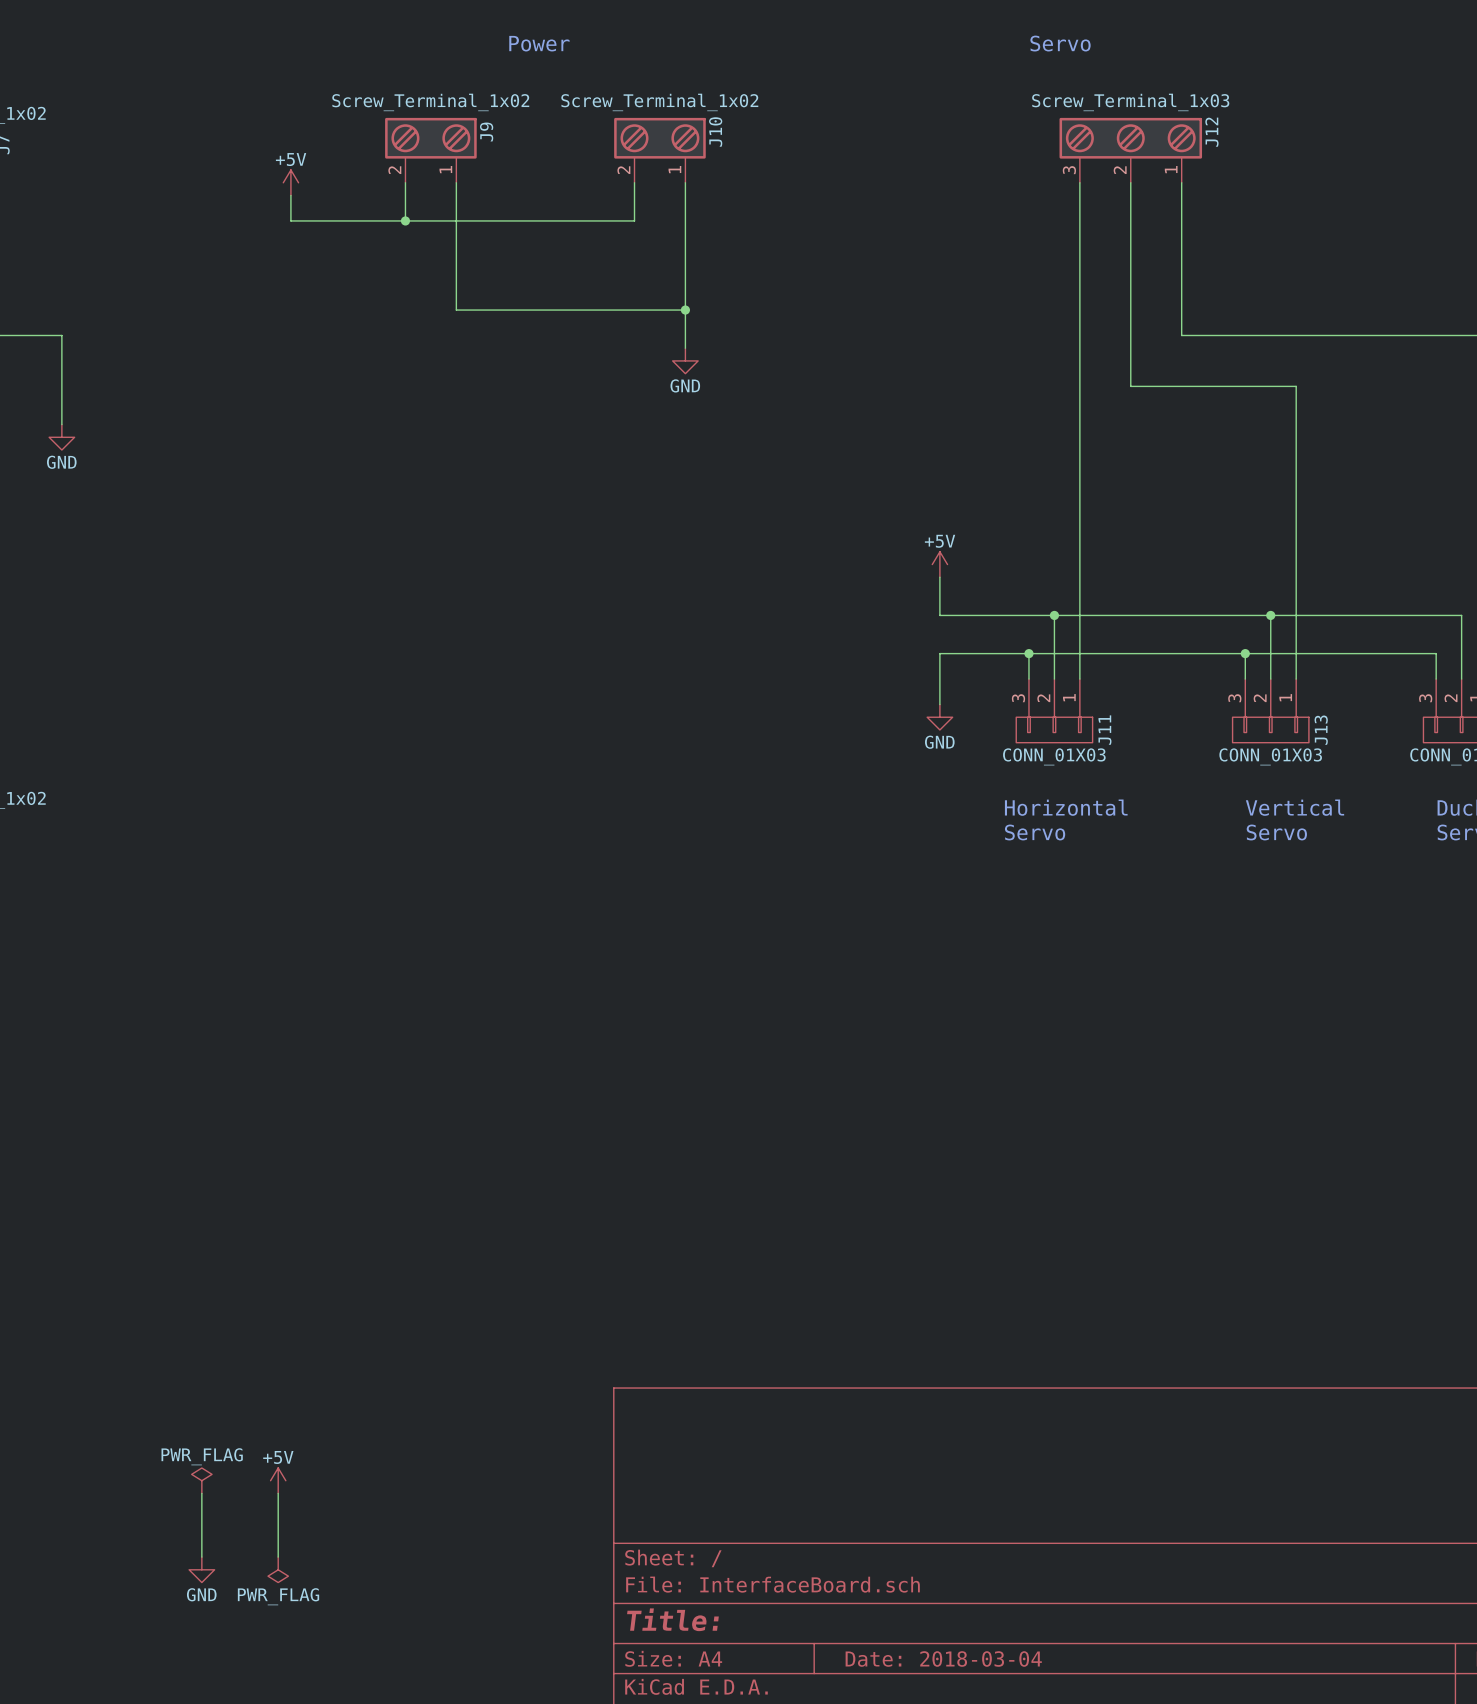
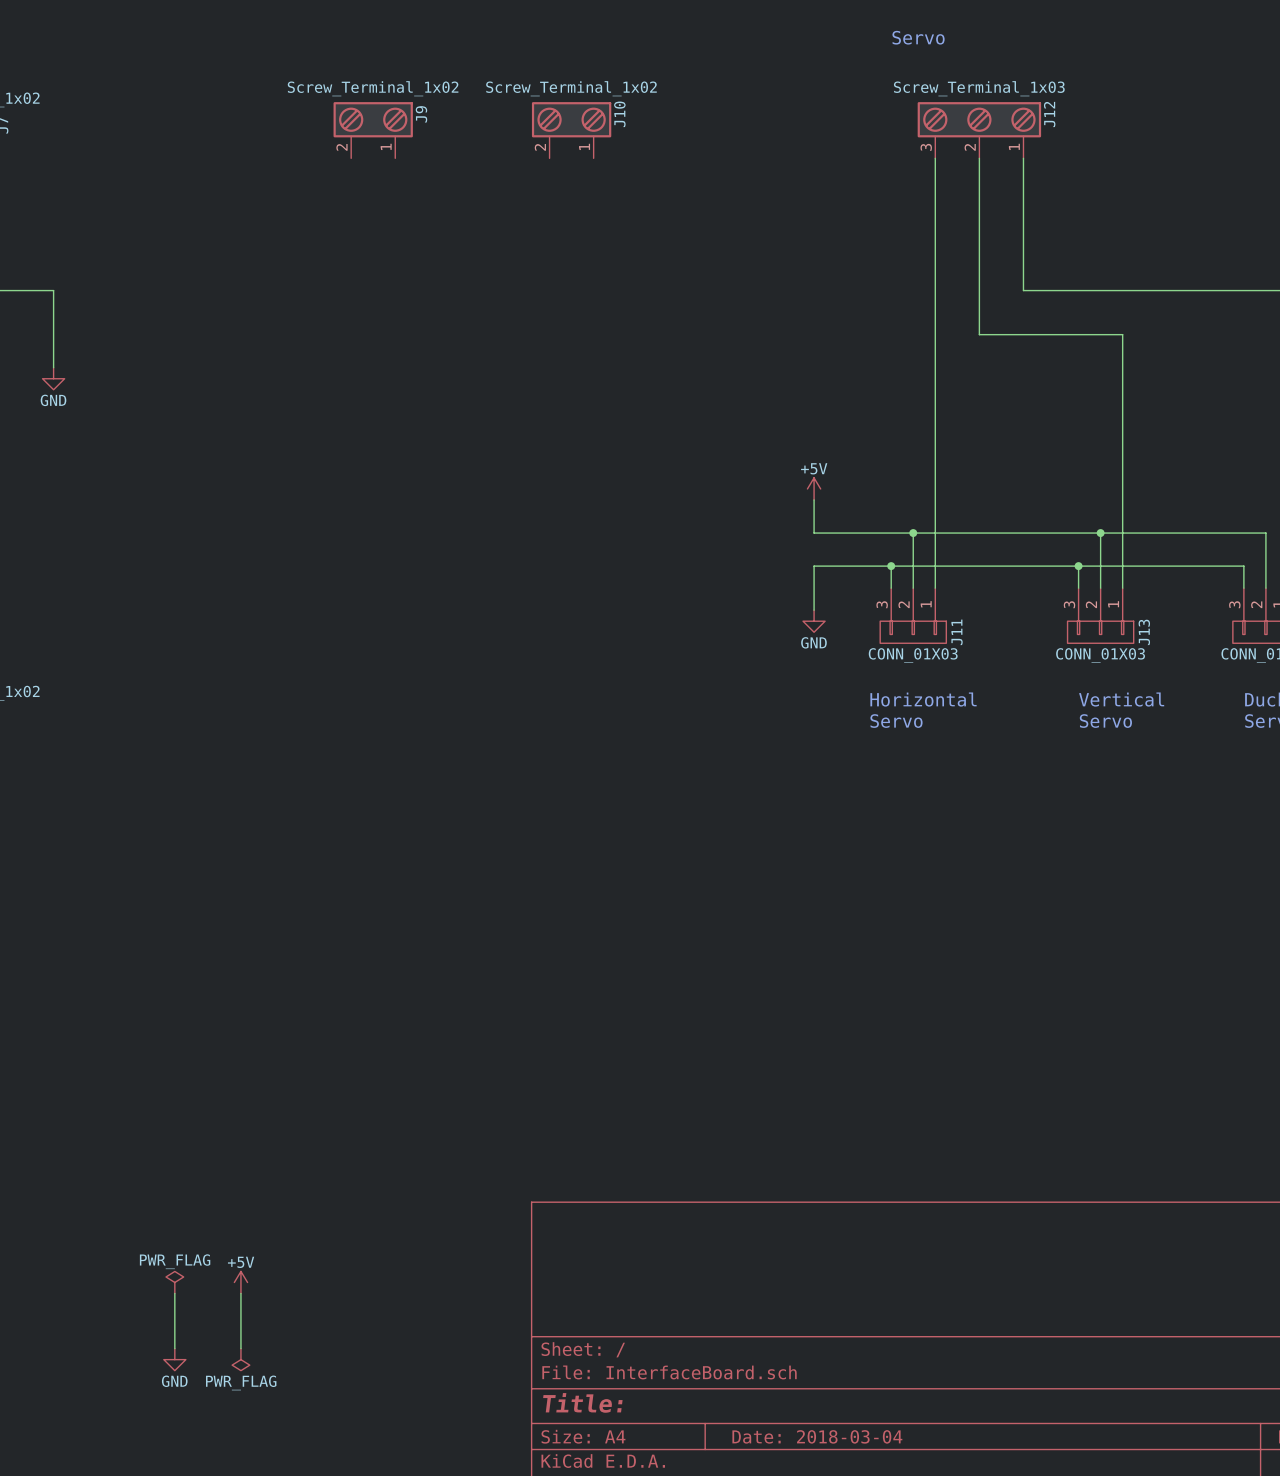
text: Power (539, 43) -> none
power symbol: +5V (290, 182) -> none
wire: (405, 182) (405, 220) -> none
wire: (456, 182) (456, 310) (685, 310) -> none
wire: (634, 182) (634, 220) (290, 220) (290, 195) -> none
wire: (685, 182) (685, 348) -> none
junction: (405, 220) -> none
junction: (685, 310) -> none
power symbol: GND (685, 360) -> none

